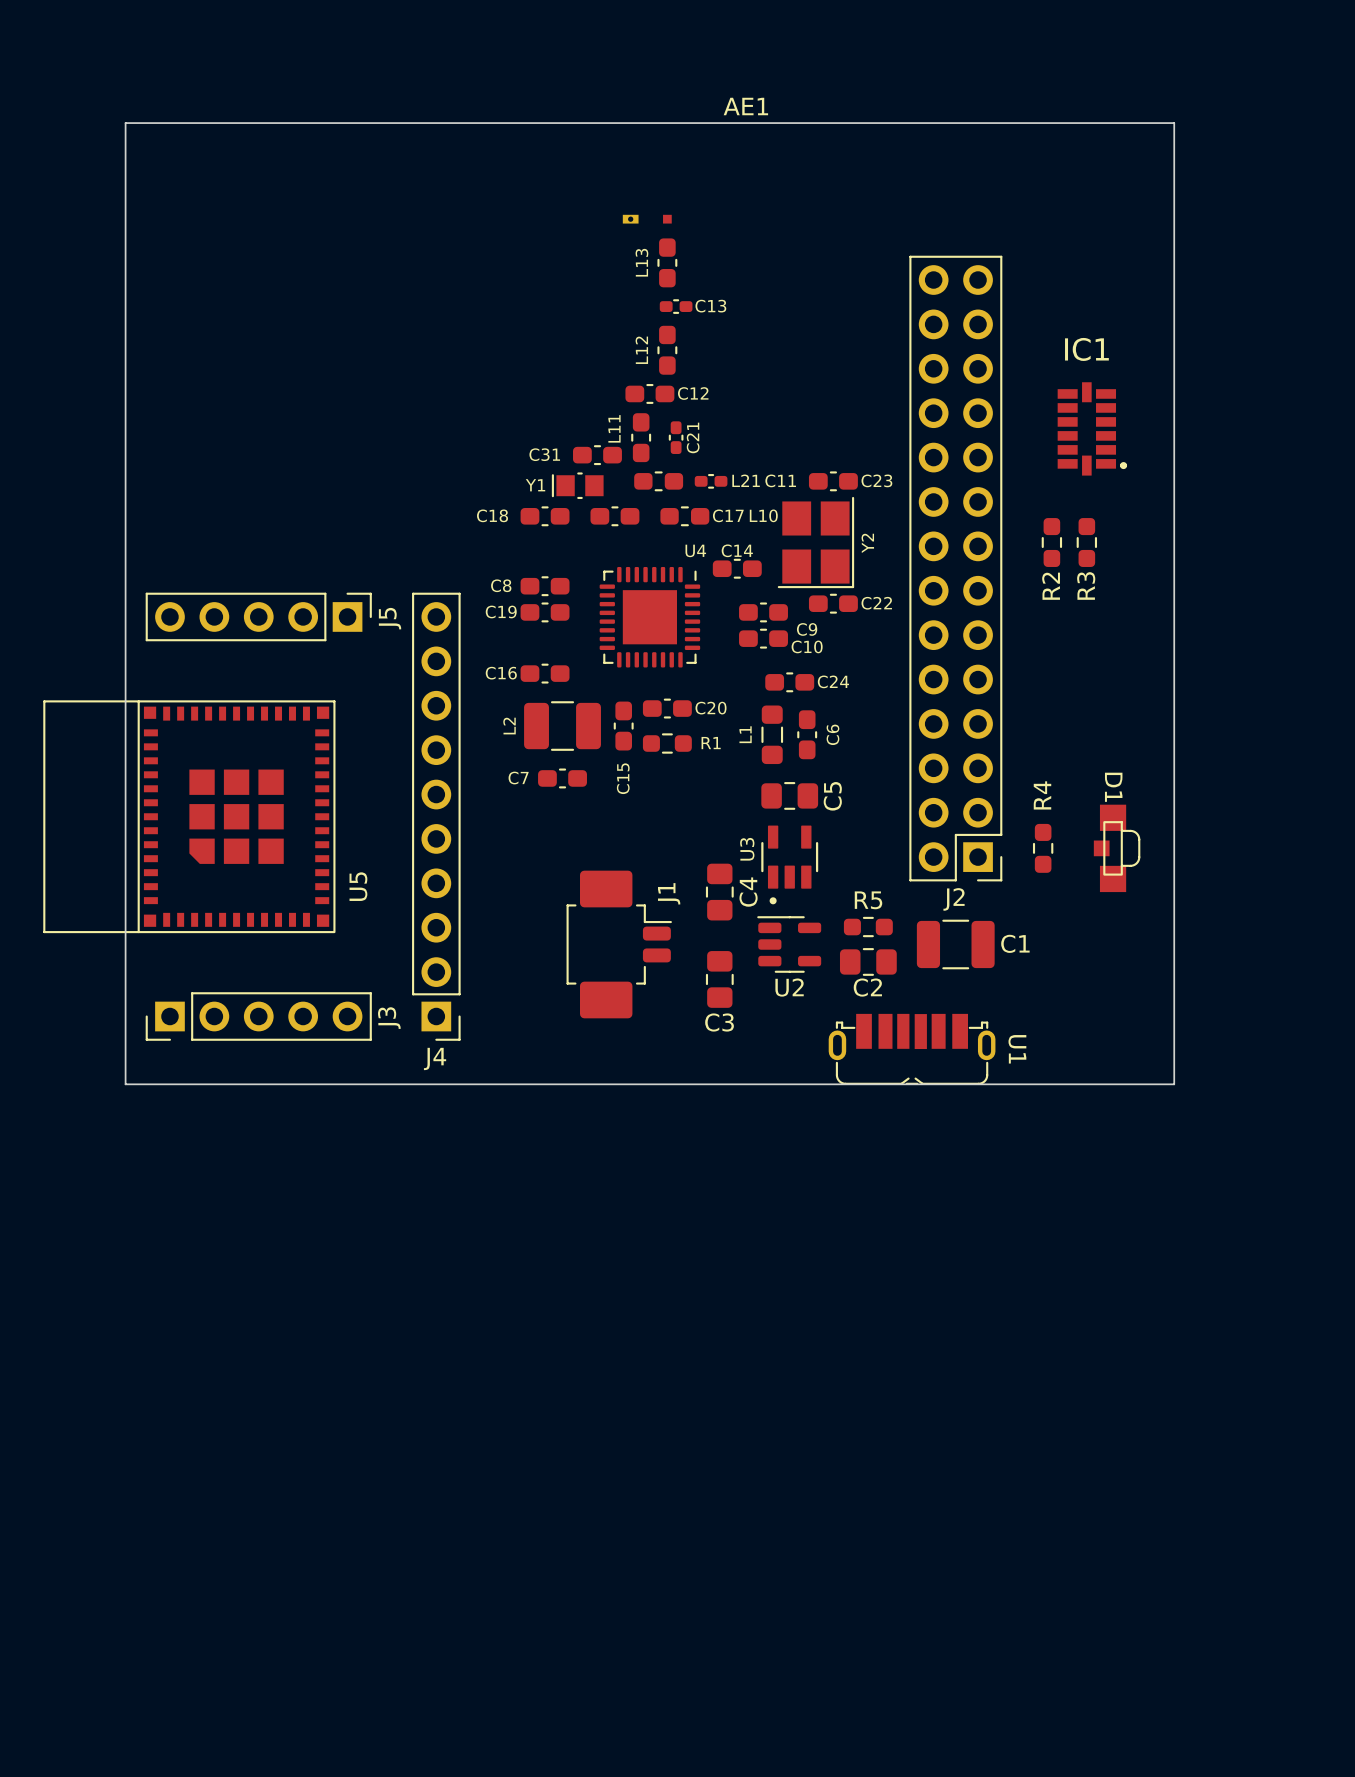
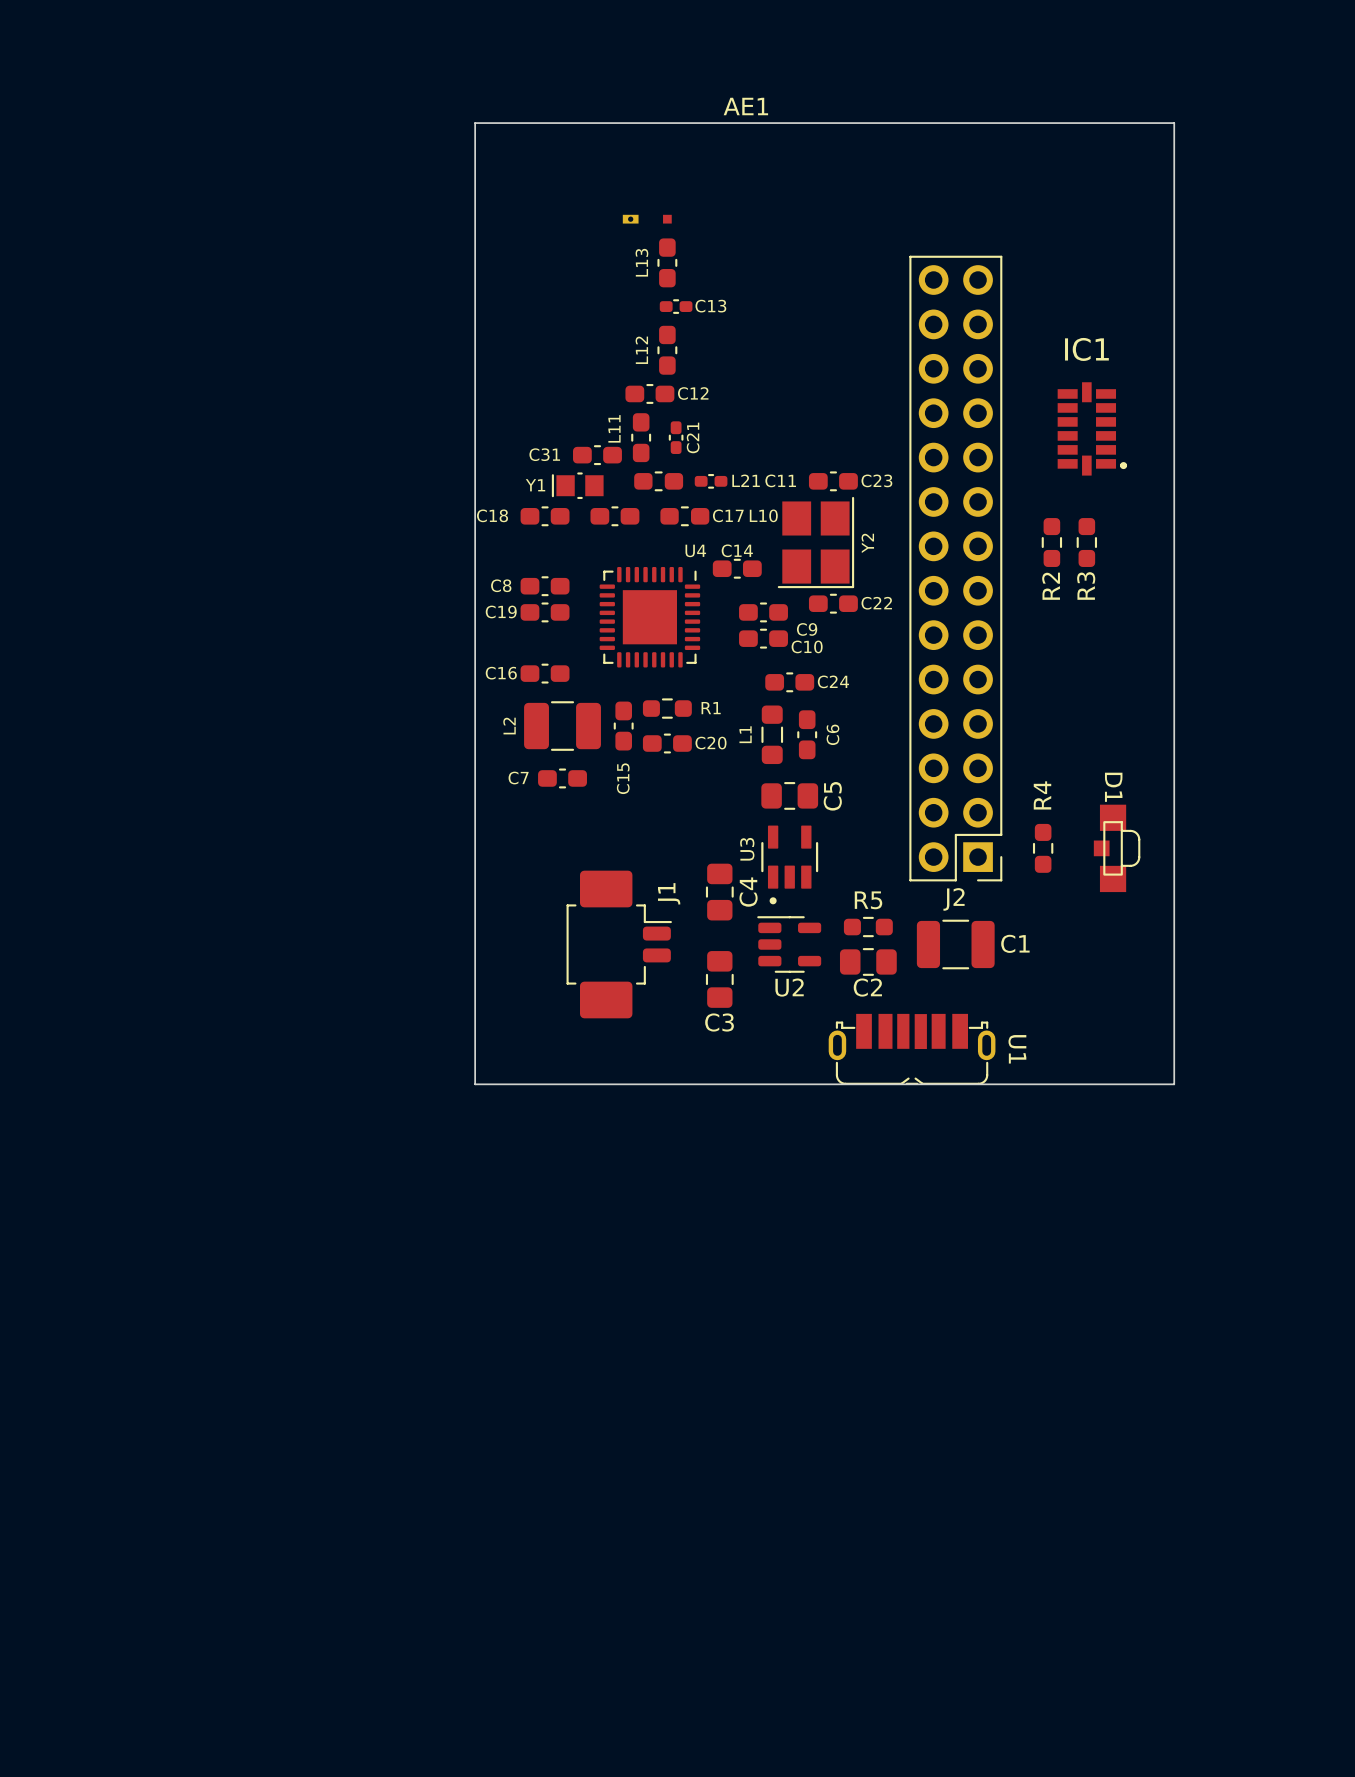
board edge: (475, 123) (125, 123) (125, 1084) (475, 1084) -> (475, 123) (475, 1084)
J5: (258, 616) -> none
C20 position: (667, 708) -> (667, 743)
R1 position: (667, 743) -> (667, 708)
U5: (189, 816) -> none
J4: (436, 816) -> none
J3: (258, 1016) -> none

